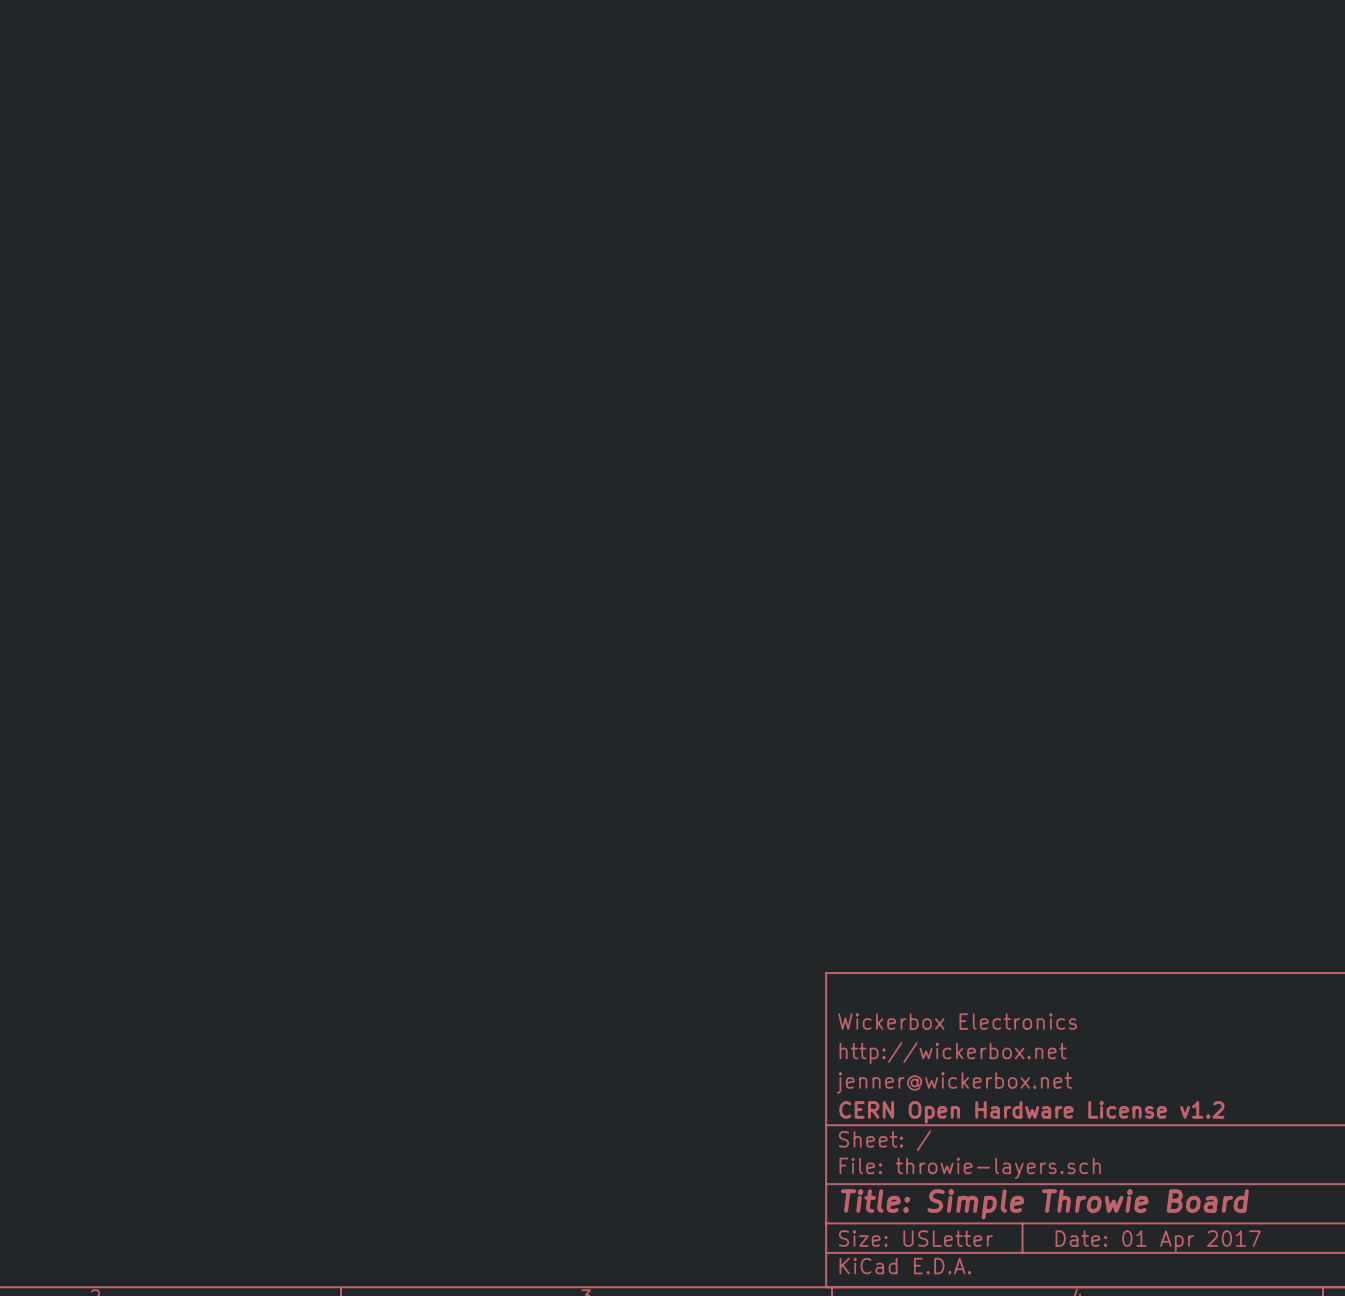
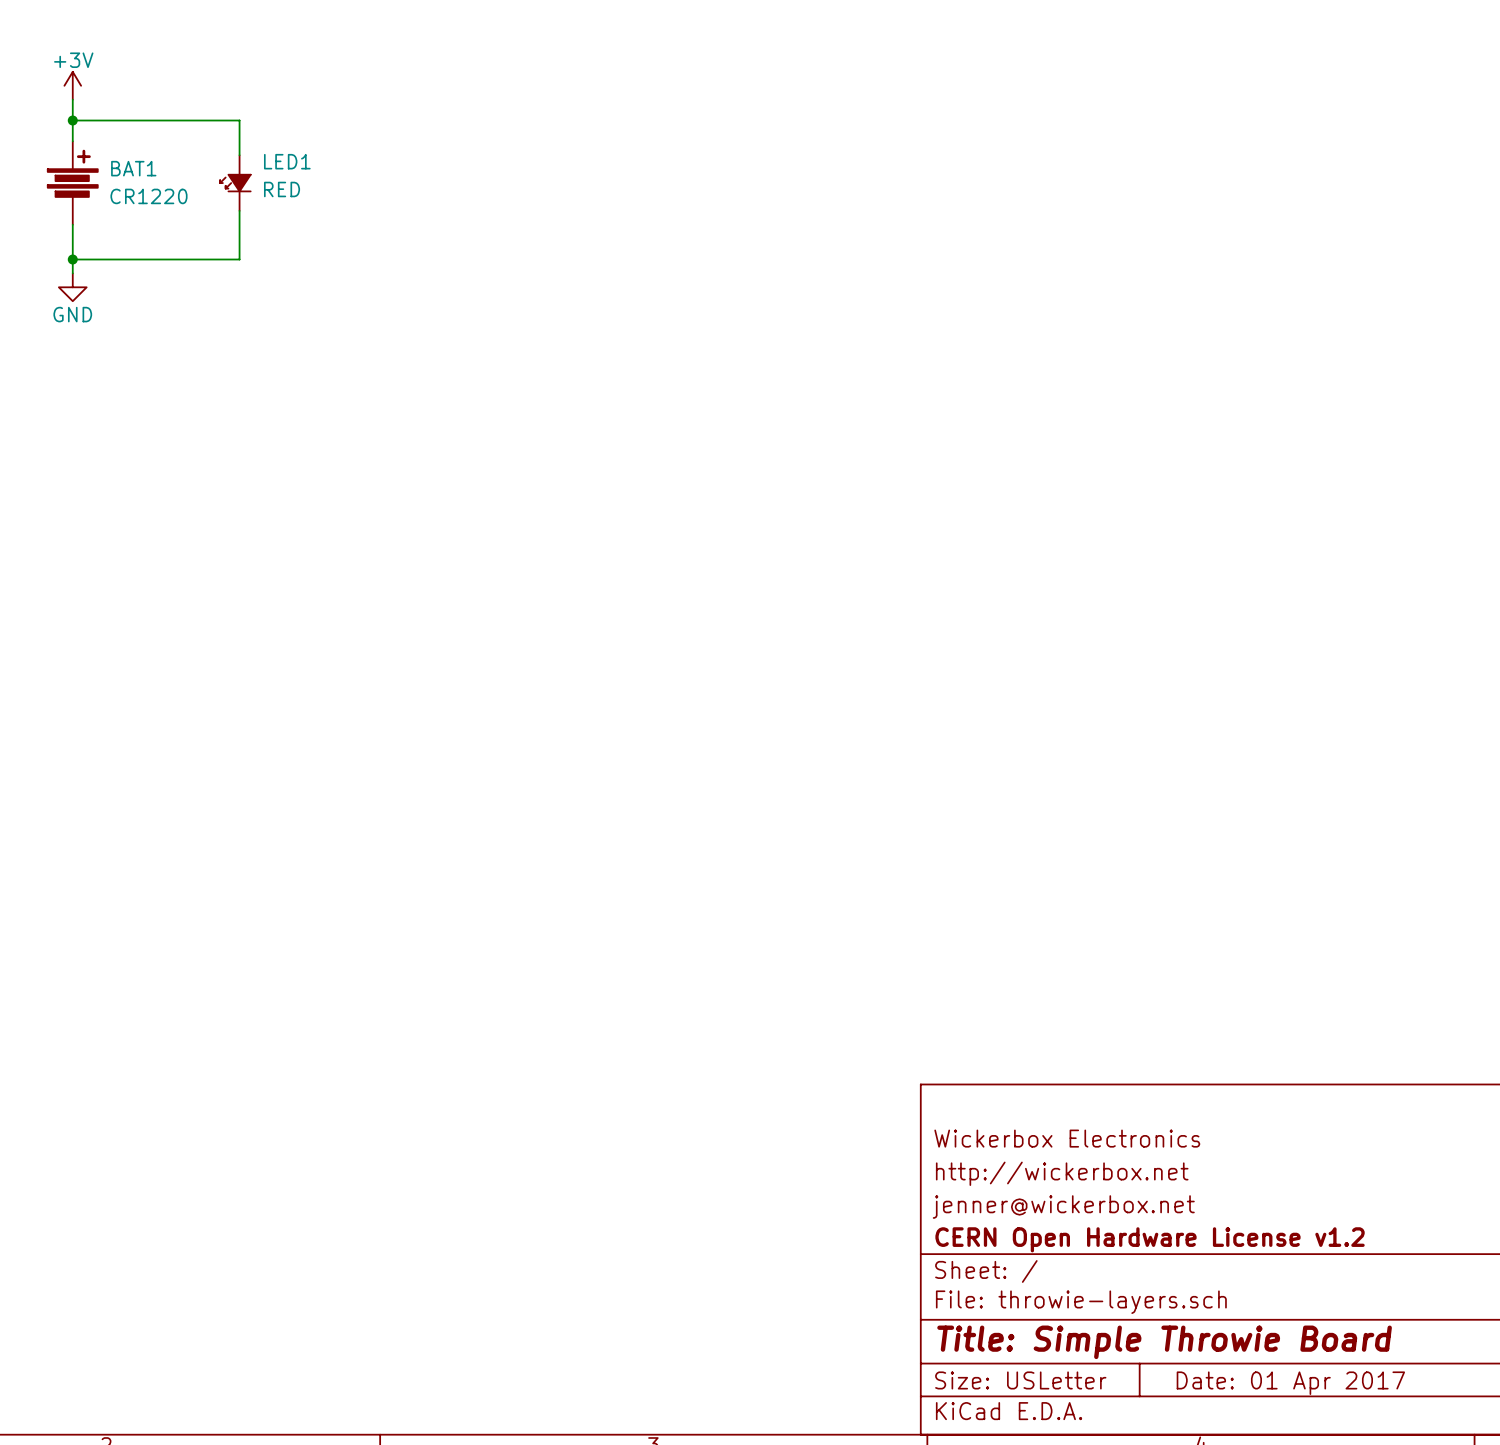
power symbol: none -> +3V (72, 85)
wire: none -> (72, 99) (72, 141)
wire: none -> (72, 120) (239, 120) (239, 155)
junction: none -> (72, 120)
BAT1: none -> CR1220 (72, 183)
LED1: none -> RED (235, 183)
wire: none -> (239, 210) (239, 259) (72, 259)
wire: none -> (72, 224) (72, 273)
junction: none -> (72, 259)
power symbol: none -> GND (72, 287)

